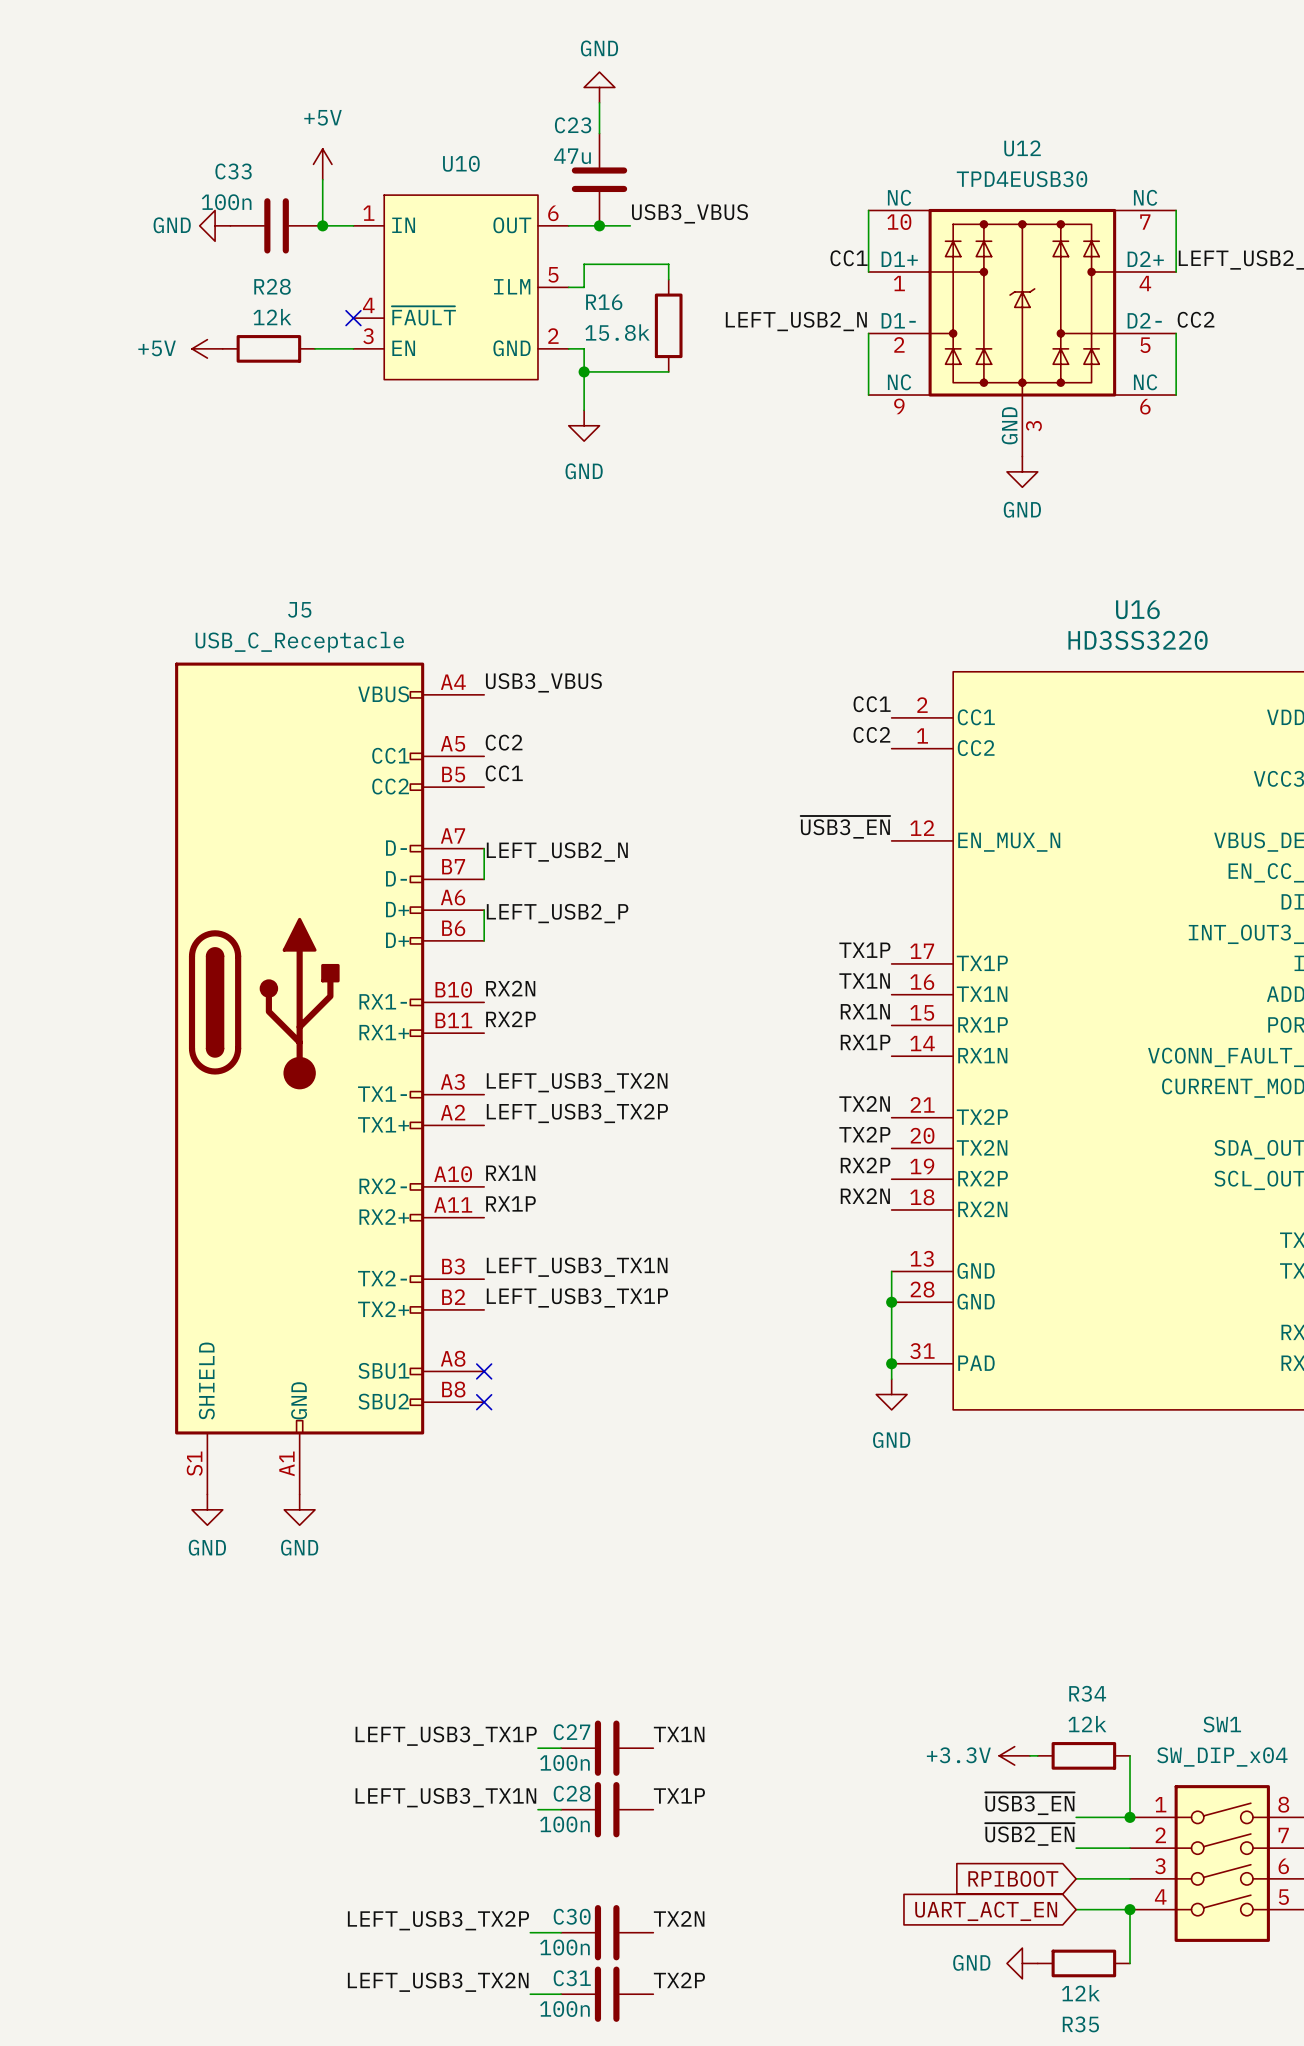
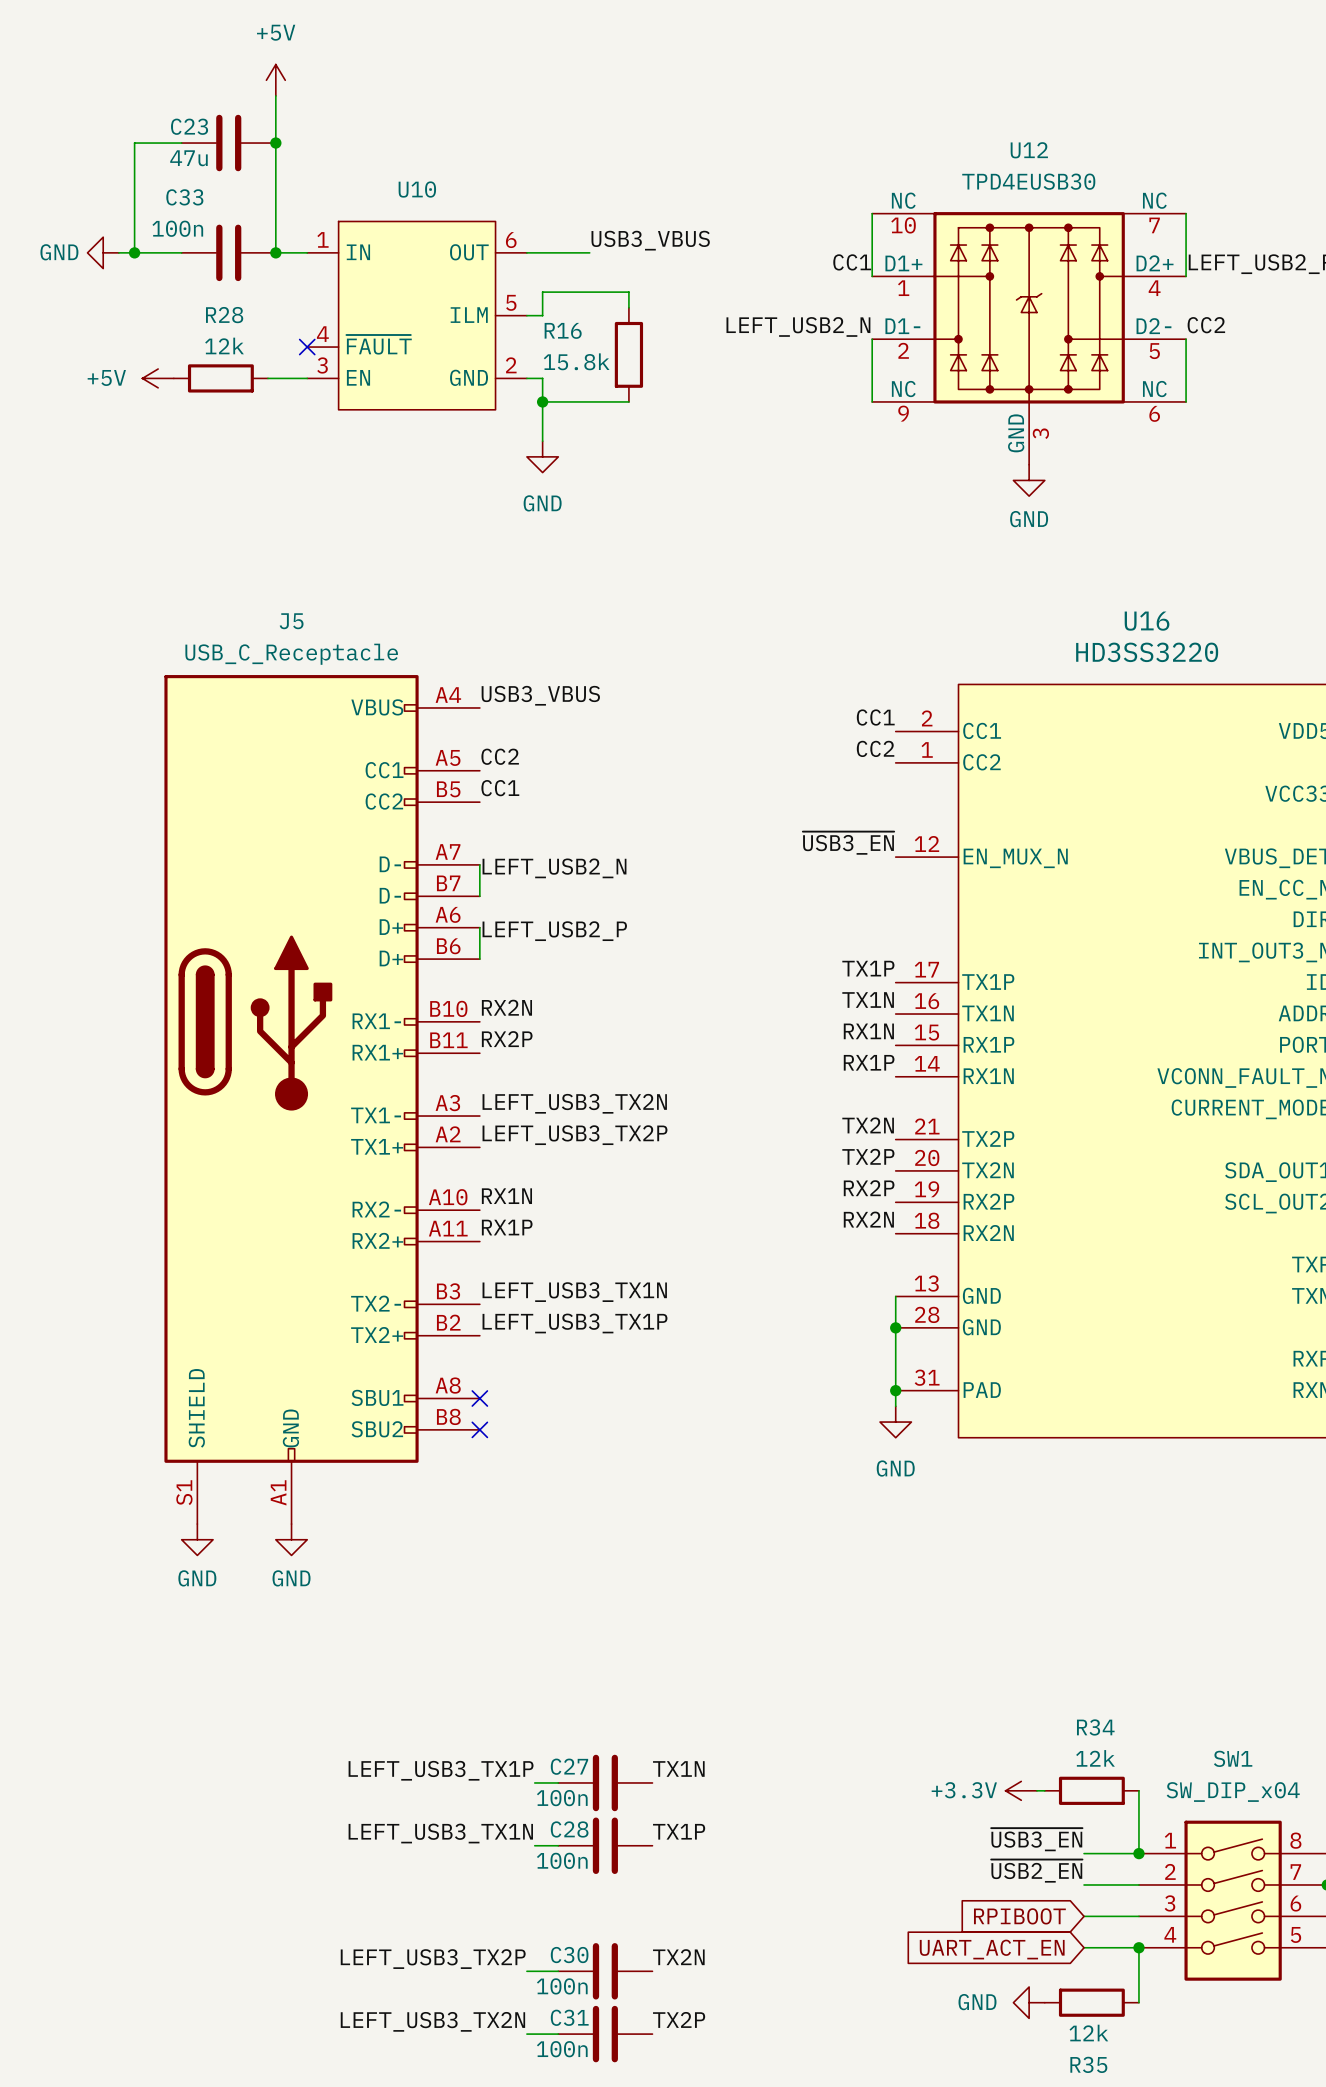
power symbol: GND (599, 87) -> none
wire: none -> (275, 95) (275, 252) (307, 252)
wire: (599, 102) (599, 133) -> none
C23 name position: C23 (573, 125) -> C23 (189, 126)
wire: none -> (181, 143) (134, 143) (134, 252)
junction: none -> (275, 143)
C23 value position: 47u (572, 156) -> 47u (188, 158)
power symbol position: +5V (322, 164) -> +5V (275, 80)
wire: (322, 179) (322, 225) (353, 225) -> none
C23 rotation: 0° (599, 179) -> 90° clockwise (228, 143)
C23 position: (599, 179) -> (228, 143)
label position: USB3_VBUS (689, 213) -> USB3_VBUS (650, 240)
power symbol position: GND (215, 225) -> GND (103, 252)
C33 position: (276, 225) -> (228, 252)
junction position: (322, 225) -> (275, 252)
wire: (568, 225) (630, 225) -> (526, 252) (589, 252)
junction: (599, 225) -> none
wire: none -> (118, 252) (181, 252)
junction: none -> (134, 252)
wire: (668, 279) (668, 264) (584, 264) (584, 287) -> (628, 307) (628, 292) (581, 292)
U10 position: (461, 287) -> (417, 315)
wire: none -> (566, 292) (542, 292) (542, 315) (526, 315)
no-connect mark position: (353, 318) -> (307, 347)
R16 position: (668, 325) -> (628, 354)
power symbol position: +5V (207, 348) -> +5V (158, 378)
R28 position: (268, 348) -> (220, 378)
wire: (315, 348) (353, 348) -> (267, 378) (307, 378)
wire: (568, 348) (584, 348) (584, 410) -> (526, 378) (542, 378) (542, 441)
wire: (584, 371) (668, 371) -> (542, 401) (628, 401)
junction position: (584, 371) -> (542, 401)
power symbol position: GND (584, 425) -> GND (542, 456)

